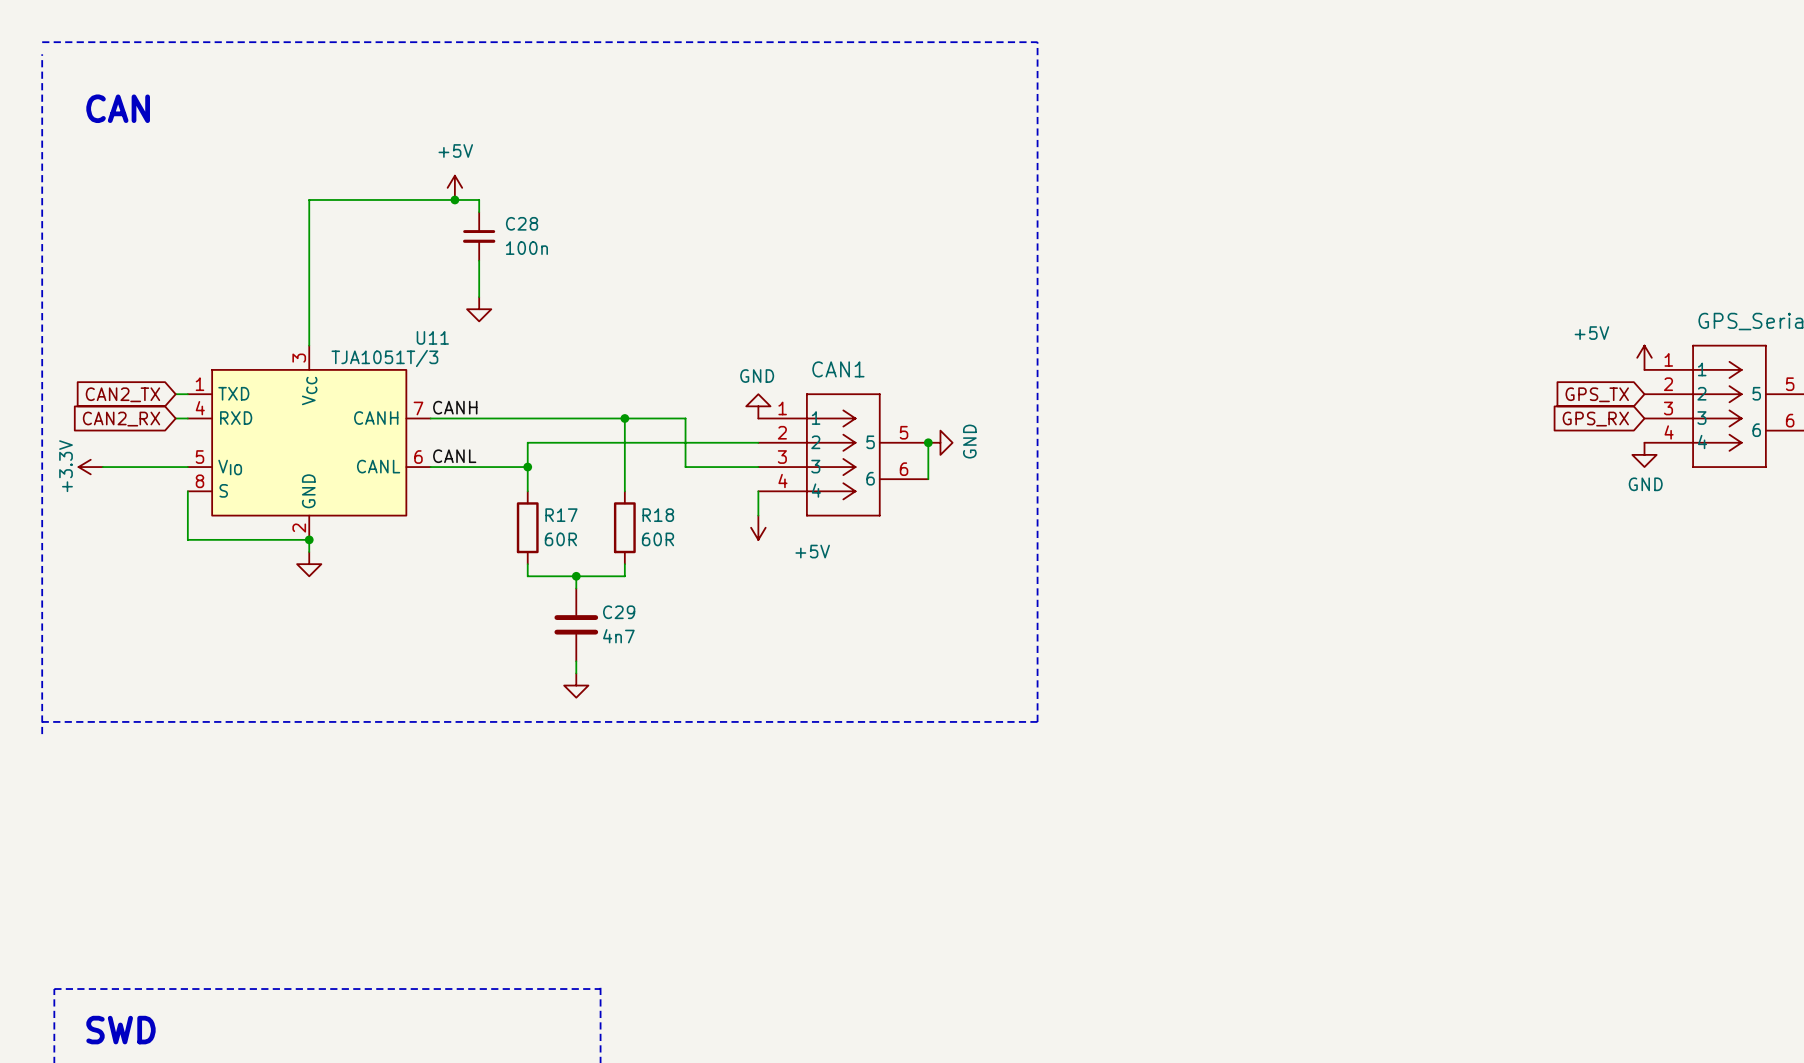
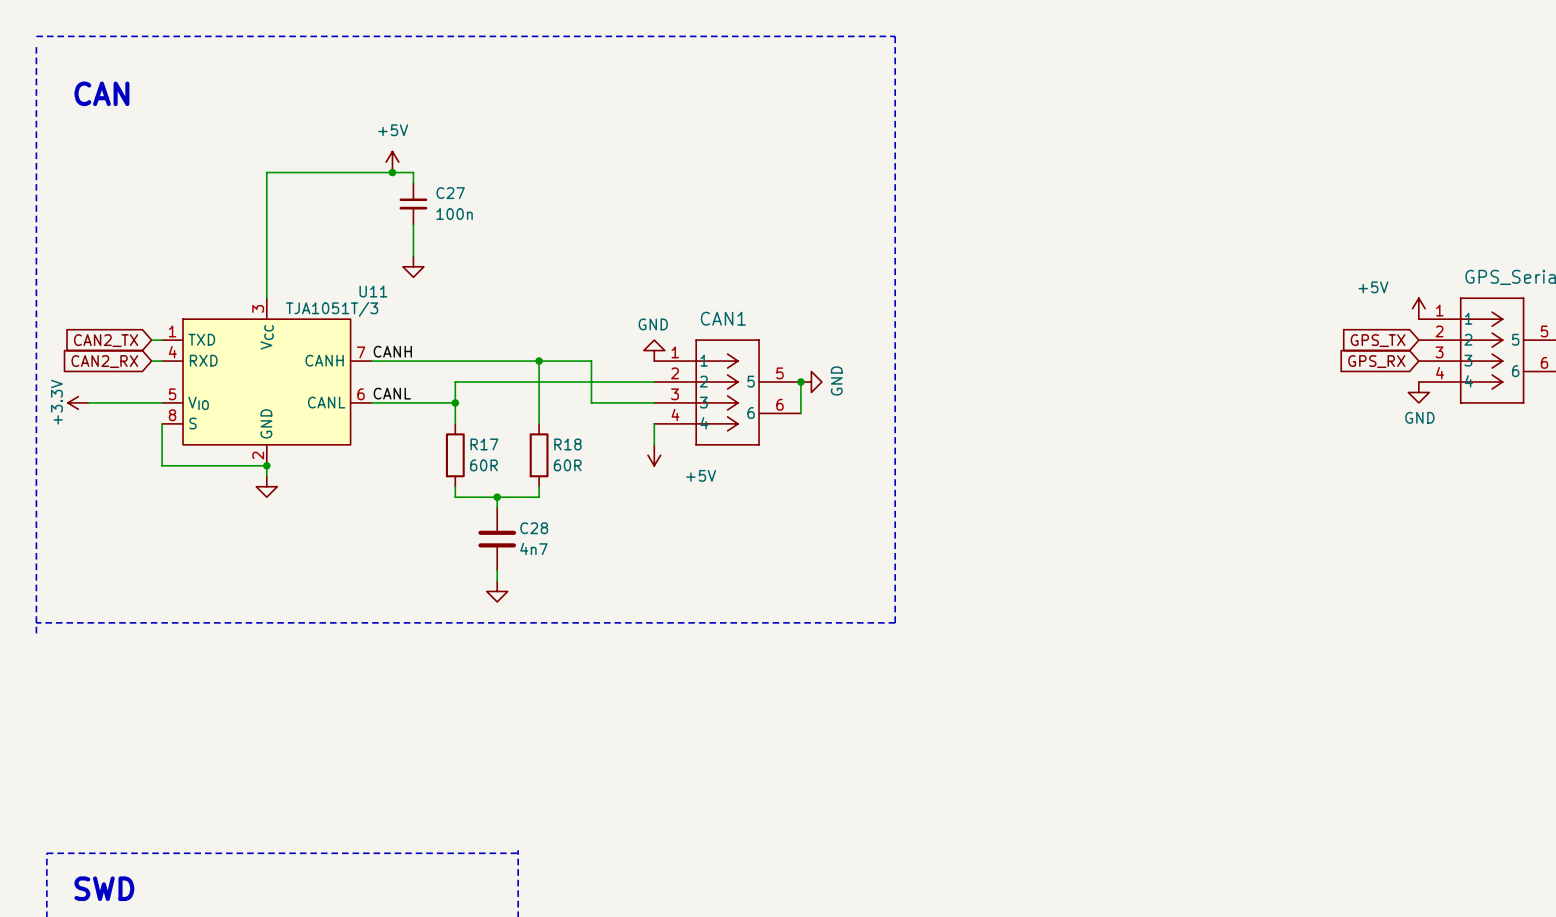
C28 name: C28 (522, 223) -> C27 (450, 193)
C29 name: C29 (619, 612) -> C28 (534, 528)

